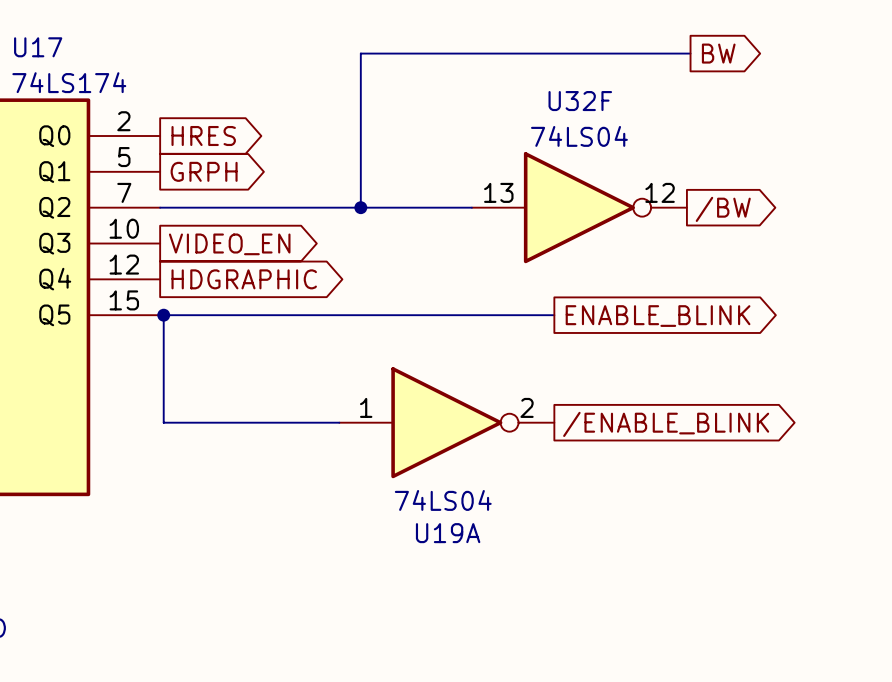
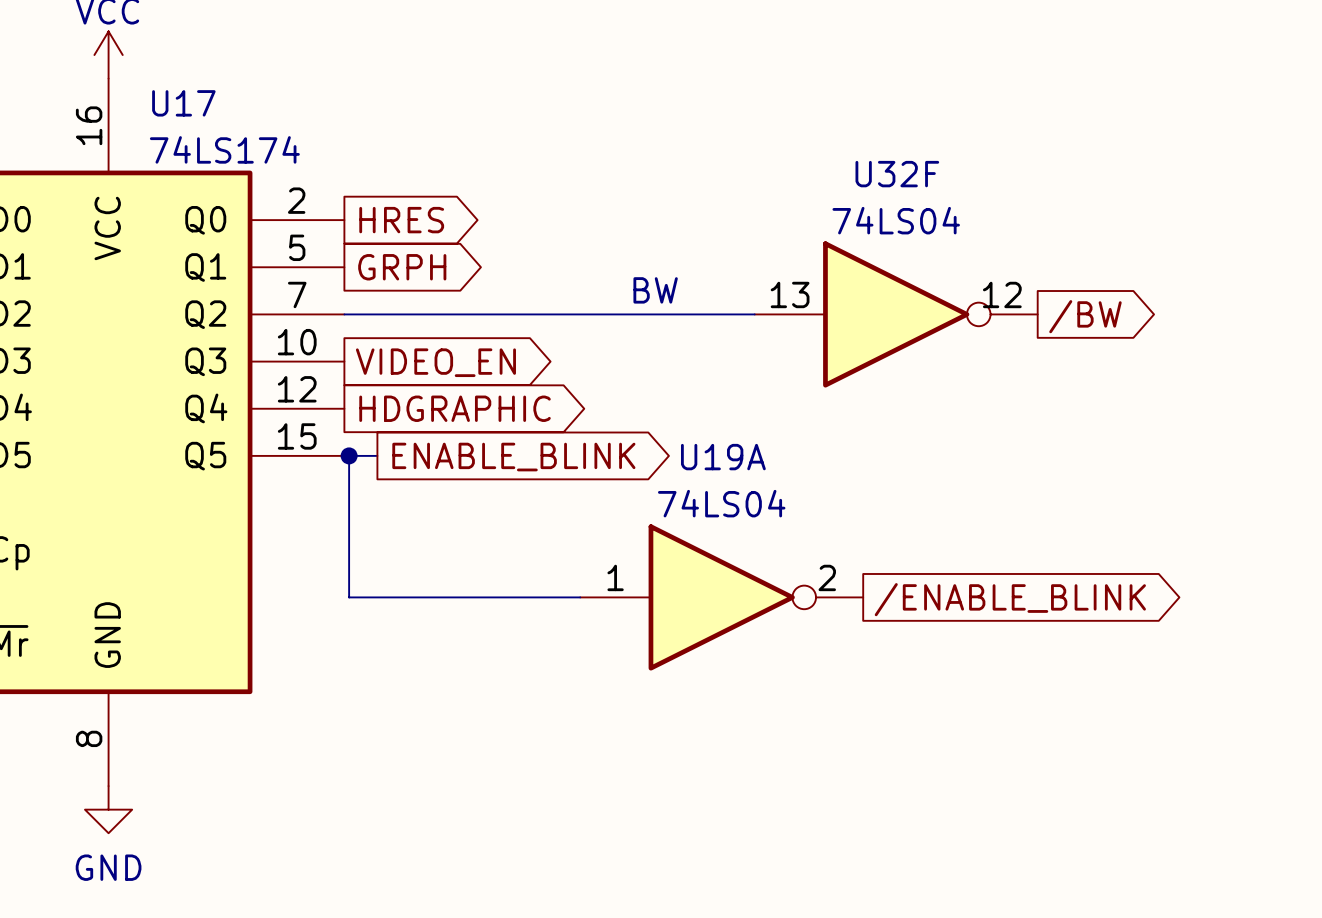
wire: (690, 53) (360, 53) (360, 207) -> none
global label: BW (718, 53) -> none
text: none -> BW (655, 290)
junction: (360, 207) -> none
wire: (185, 315) (554, 315) -> none
global label: none -> ENABLE_BLINK (513, 457)
global label: ENABLE_BLINK (658, 316) -> none
U19A value position: 74LS04 (443, 500) -> 74LS04 (721, 503)
U19A name position: U19A (448, 533) -> U19A (723, 457)

